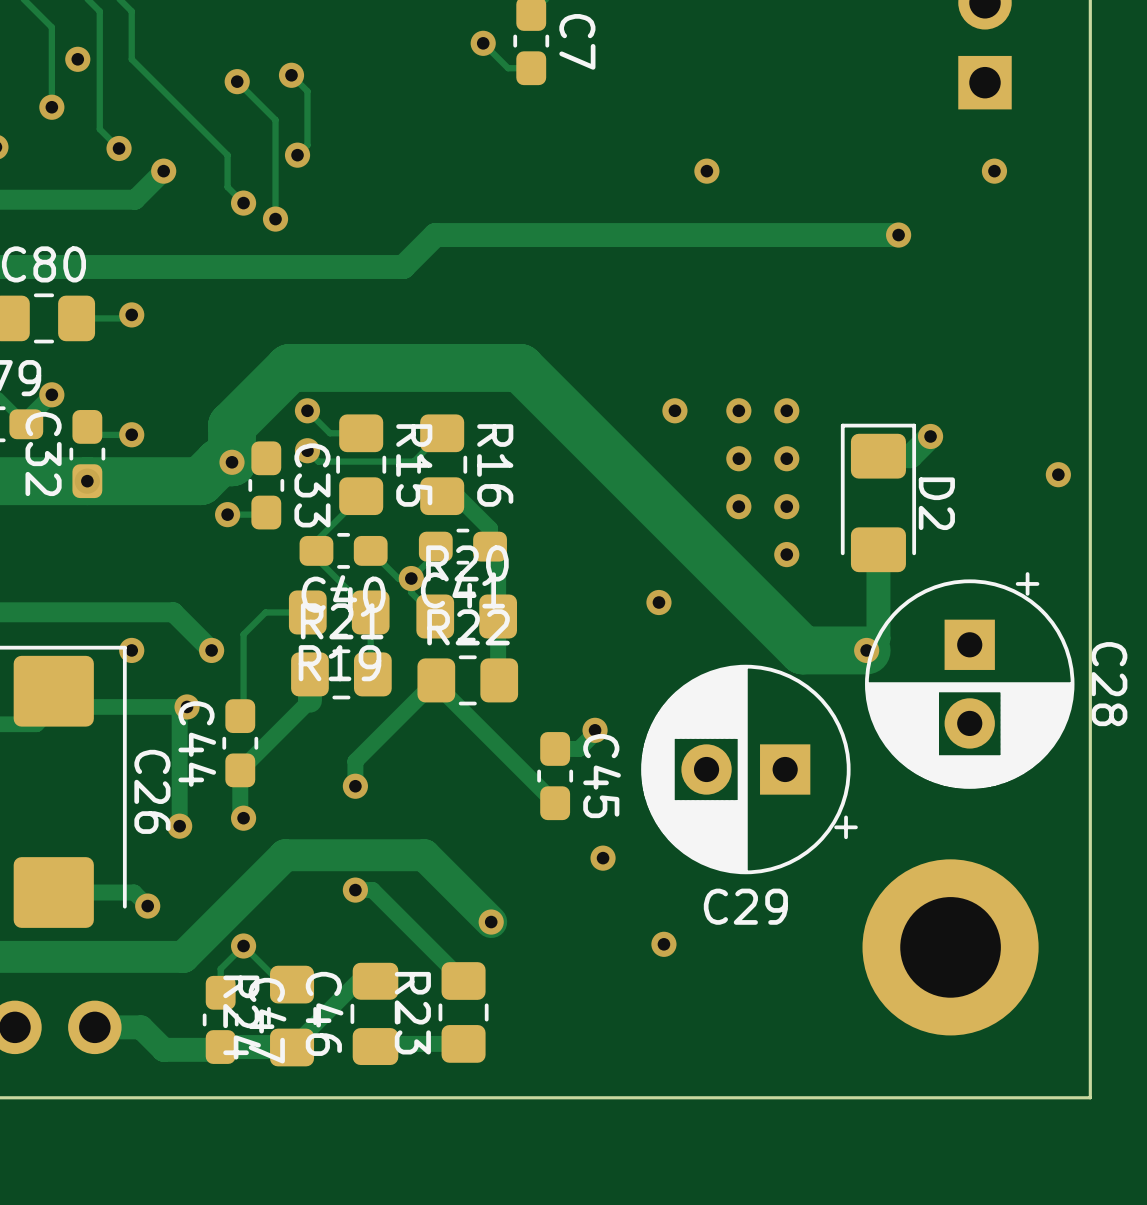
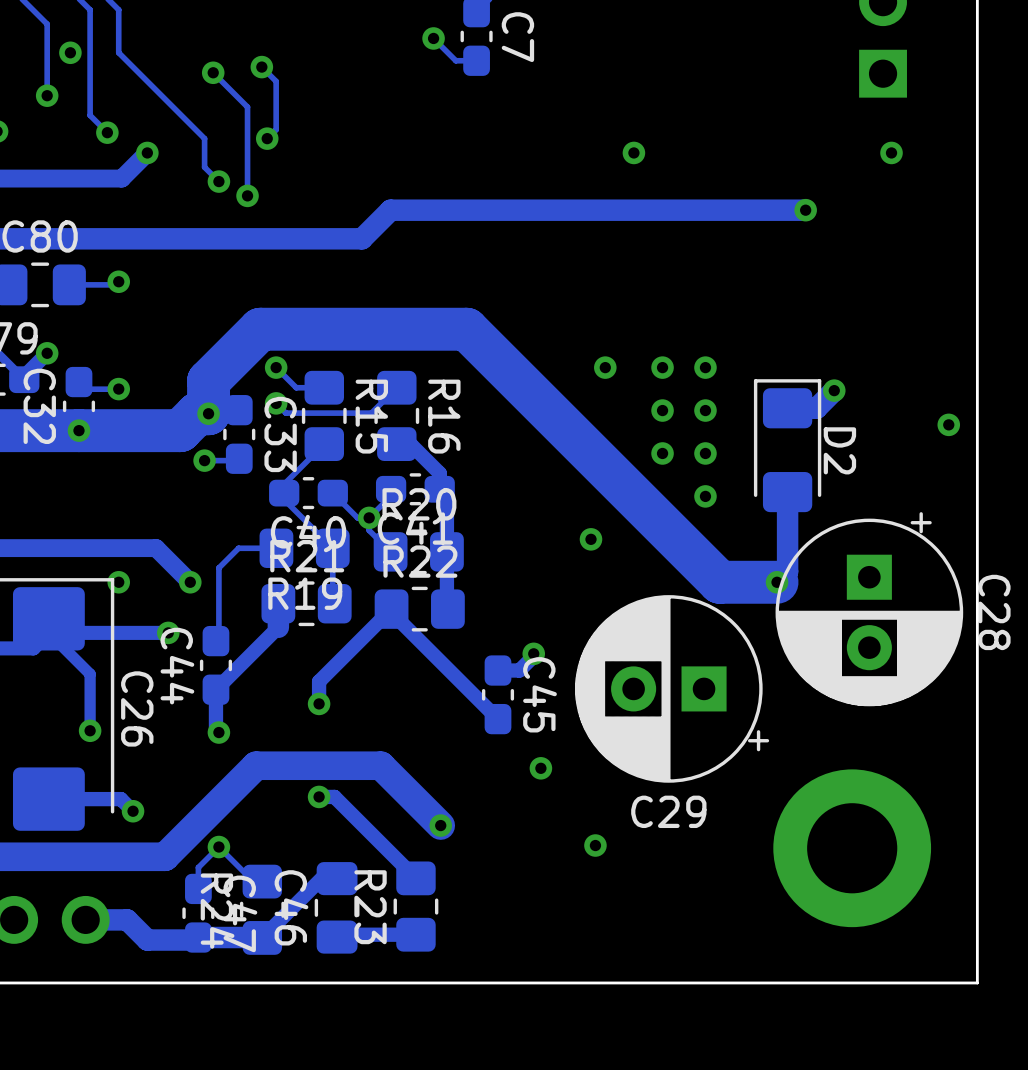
track: none -> (48, 632) (90, 674) (90, 730)
track: (187, 706) (179, 714) (179, 826) -> none
via: none -> (90, 730)
via: (179, 826) -> none

